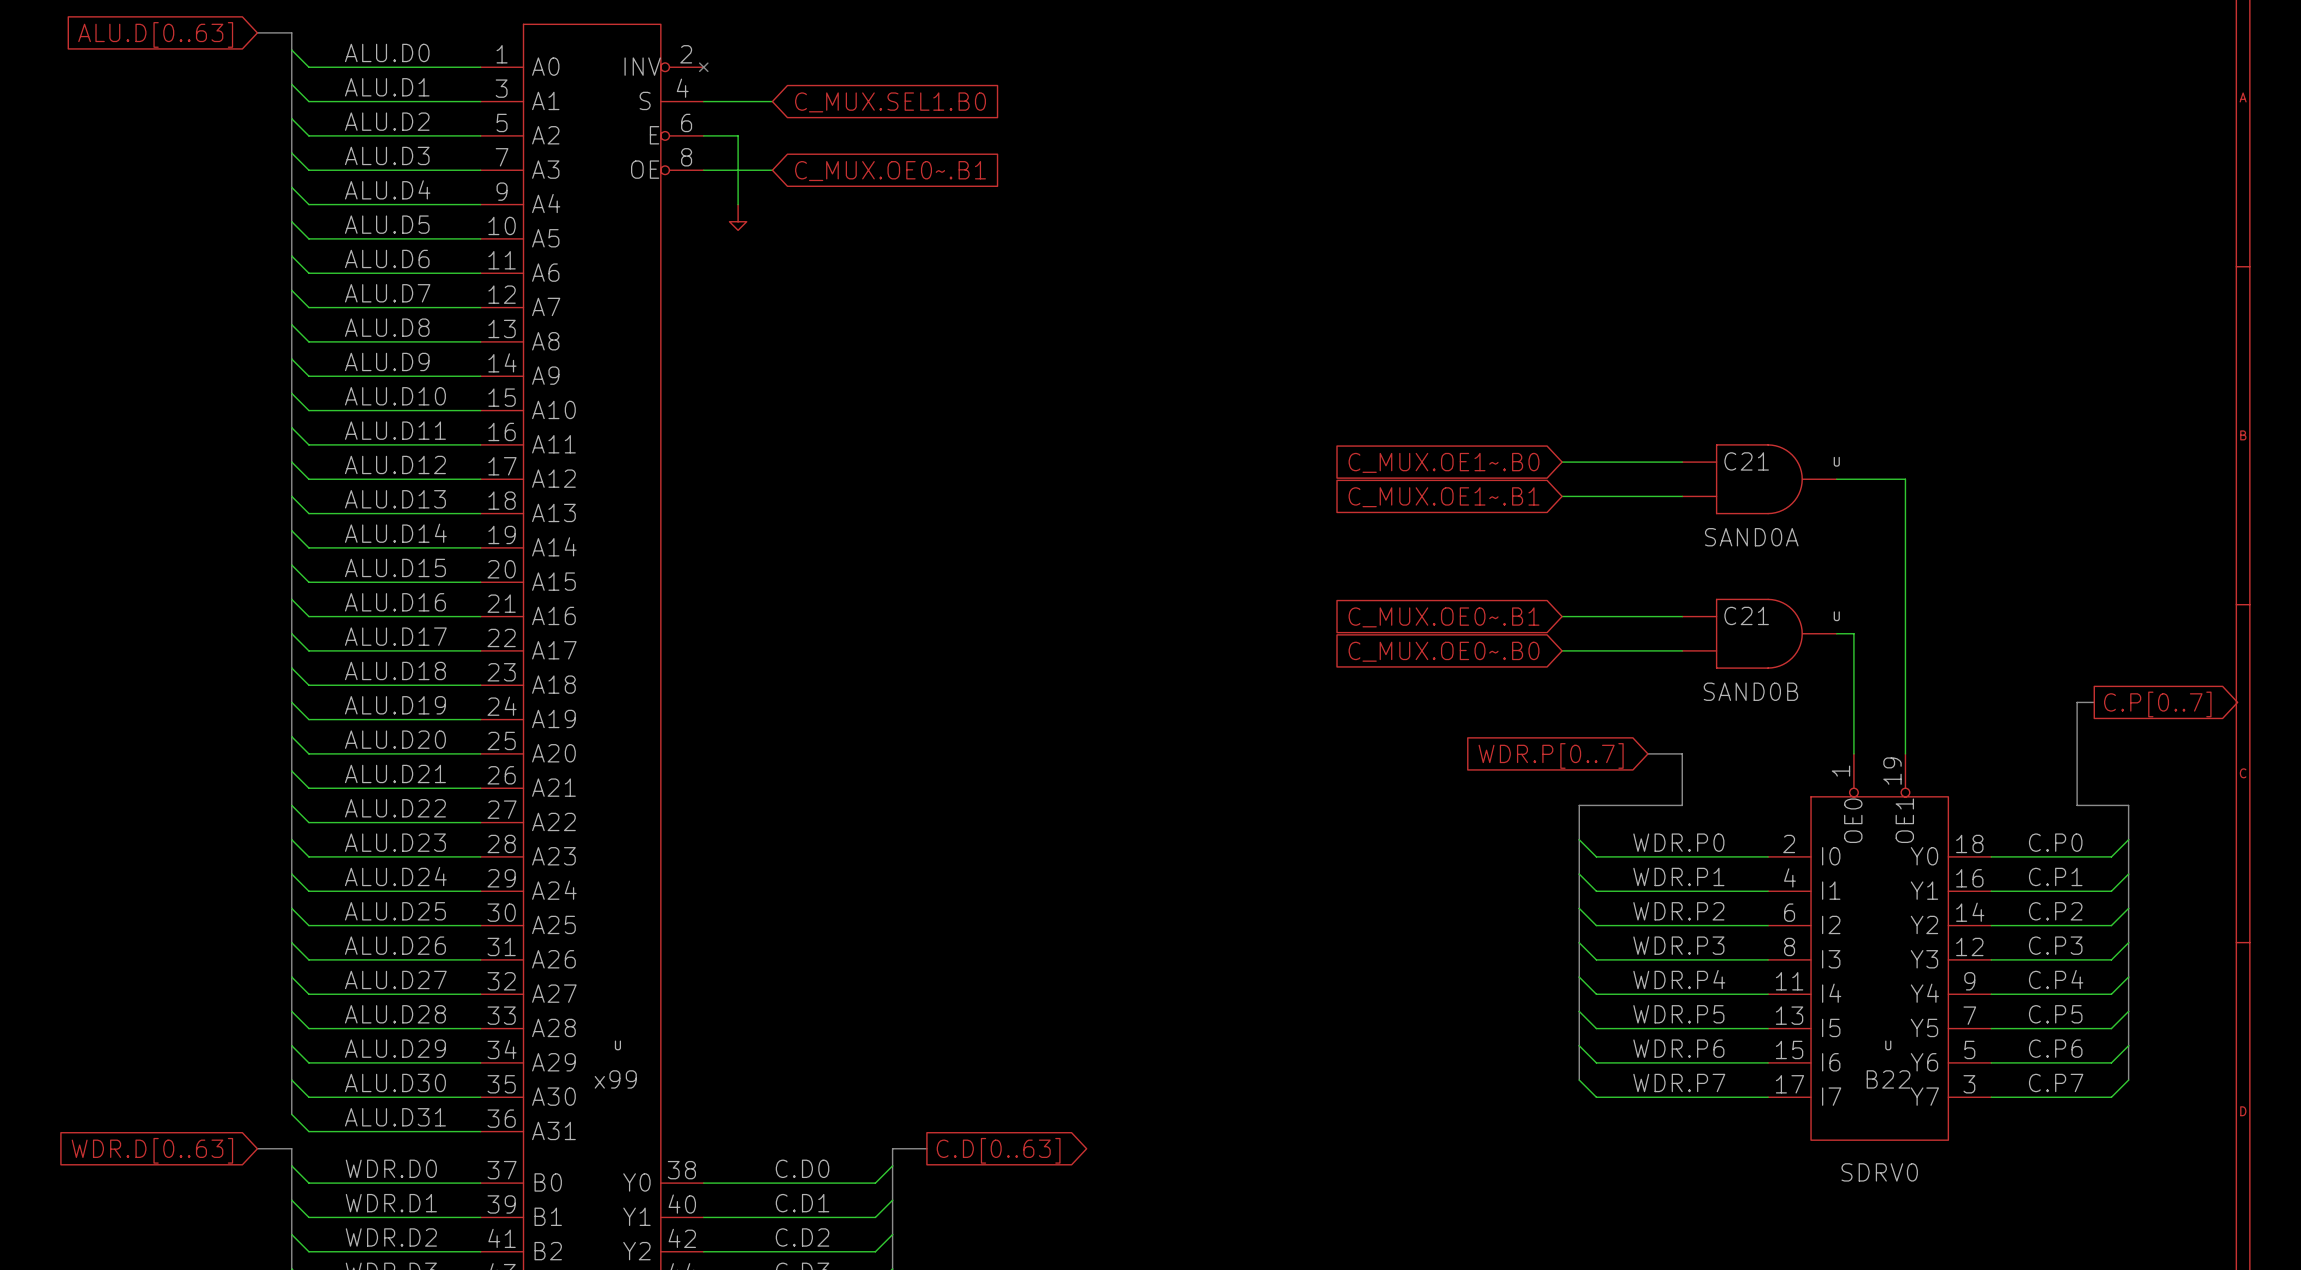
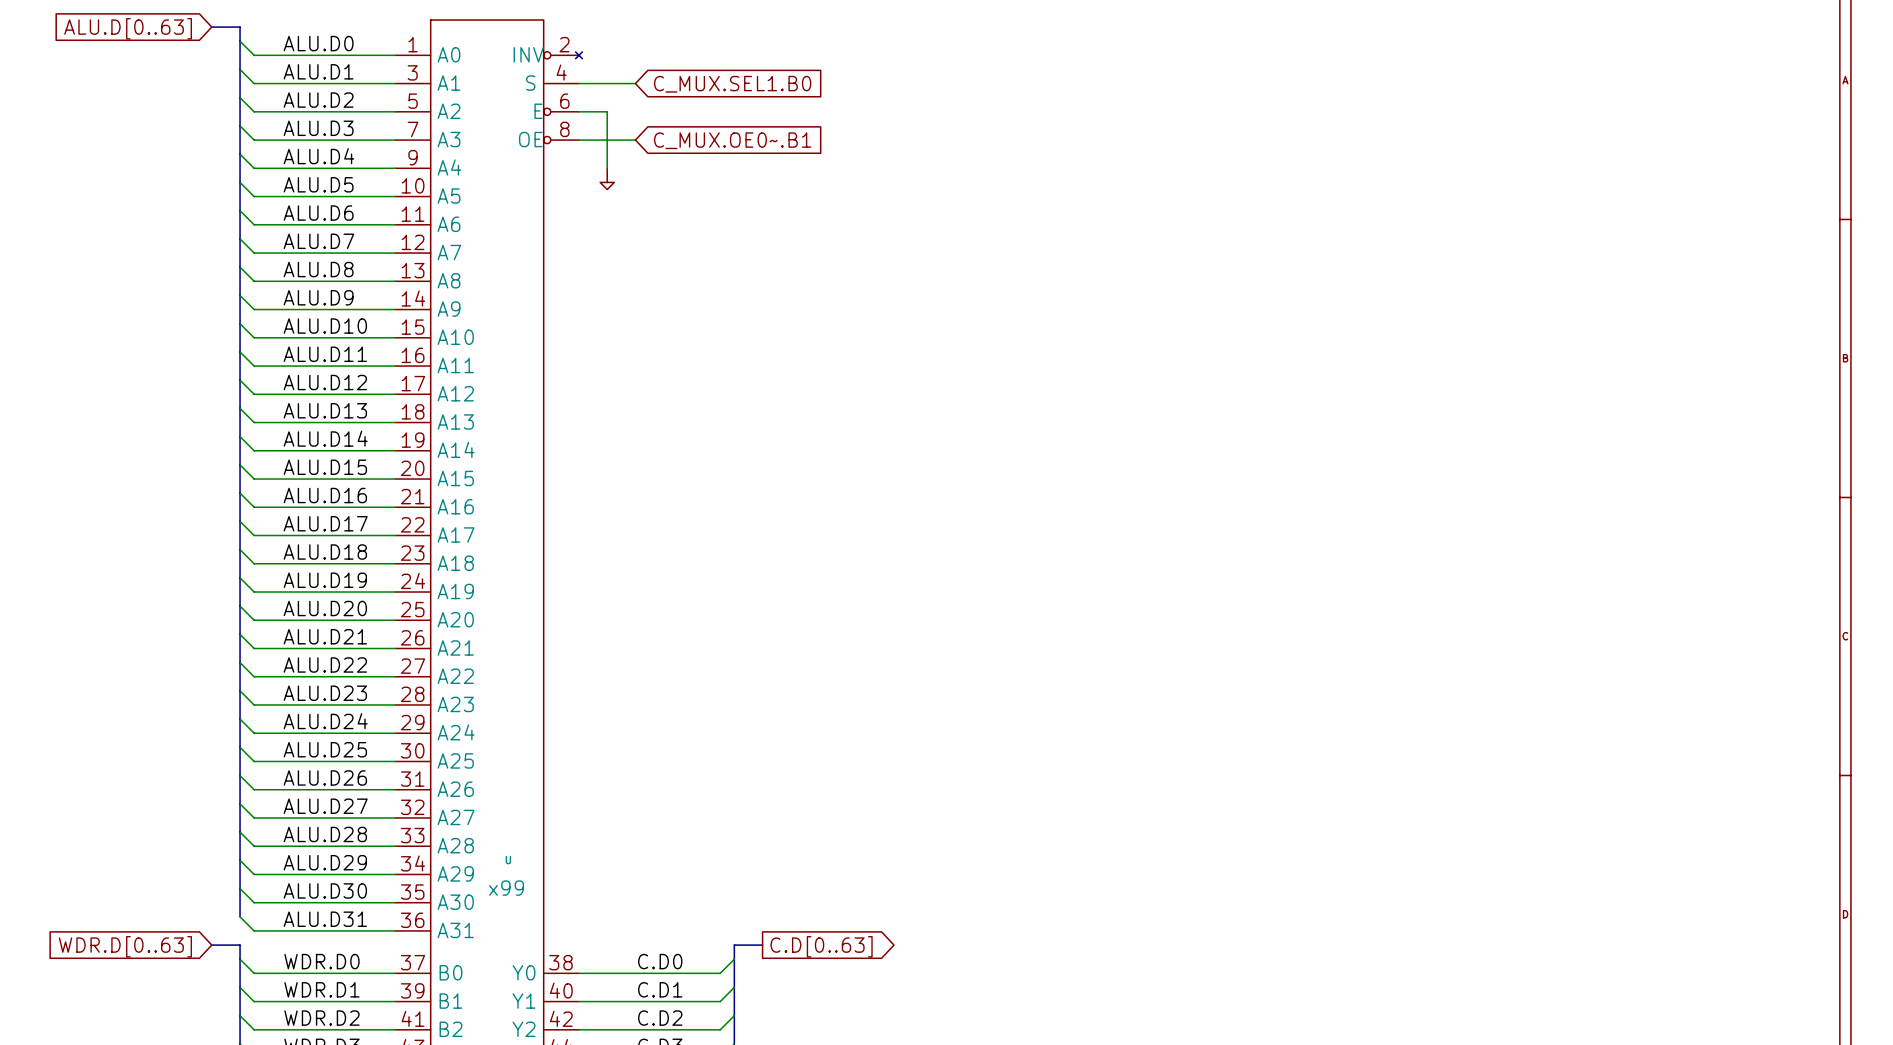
global label: C_MUX.OE1~.B0 (1444, 462) -> none
wire: (1562, 462) (1682, 462) -> none
U: (1759, 479) -> none
wire: (1836, 479) (1905, 479) (1905, 753) -> none
wire: (1562, 496) (1682, 496) -> none
global label: C_MUX.OE1~.B1 (1444, 497) -> none
wire: (1562, 616) (1682, 616) -> none
global label: C_MUX.OE0~.B1 (1444, 617) -> none
U: (1759, 633) -> none
wire: (1836, 633) (1853, 633) (1853, 753) -> none
wire: (1562, 650) (1682, 650) -> none
global label: C_MUX.OE0~.B0 (1444, 651) -> none
bus: (2094, 702) (2077, 702) (2077, 805) (2128, 805) (2128, 1080) -> none
global label: C.P[0..7] (2157, 704) -> none
bus: (1647, 753) (1682, 753) (1682, 805) (1579, 805) (1579, 1080) -> none
global label: WDR.P[0..7] (1551, 755) -> none
wire: (1579, 839) (1596, 856) (1768, 856) -> none
wire: (2128, 839) (2111, 856) (1991, 856) -> none
label: WDR.P0 (1678, 842) -> none
label: C.P0 (2055, 842) -> none
wire: (1579, 874) (1596, 891) (1768, 891) -> none
wire: (2128, 874) (2111, 891) (1991, 891) -> none
label: WDR.P1 (1678, 876) -> none
label: C.P1 (2055, 876) -> none
wire: (1579, 908) (1596, 925) (1768, 925) -> none
wire: (2128, 908) (2111, 925) (1991, 925) -> none
label: WDR.P2 (1678, 911) -> none
label: C.P2 (2055, 911) -> none
wire: (1579, 942) (1596, 959) (1768, 959) -> none
wire: (2128, 942) (2111, 959) (1991, 959) -> none
label: WDR.P3 (1678, 945) -> none
label: C.P3 (2055, 945) -> none
U: (1879, 947) -> none
wire: (1579, 977) (1596, 994) (1768, 994) -> none
wire: (2128, 977) (2111, 994) (1991, 994) -> none
label: WDR.P4 (1679, 979) -> none
label: C.P4 (2056, 979) -> none
wire: (1579, 1011) (1596, 1028) (1768, 1028) -> none
wire: (2128, 1011) (2111, 1028) (1991, 1028) -> none
label: WDR.P5 (1678, 1014) -> none
label: C.P5 (2055, 1014) -> none
wire: (1579, 1045) (1596, 1062) (1768, 1062) -> none
wire: (2128, 1045) (2111, 1062) (1991, 1062) -> none
label: WDR.P6 (1678, 1048) -> none
label: C.P6 (2055, 1048) -> none
wire: (1579, 1080) (1596, 1097) (1768, 1097) -> none
wire: (2128, 1080) (2111, 1097) (1991, 1097) -> none
label: WDR.P7 (1679, 1082) -> none
label: C.P7 (2056, 1082) -> none

